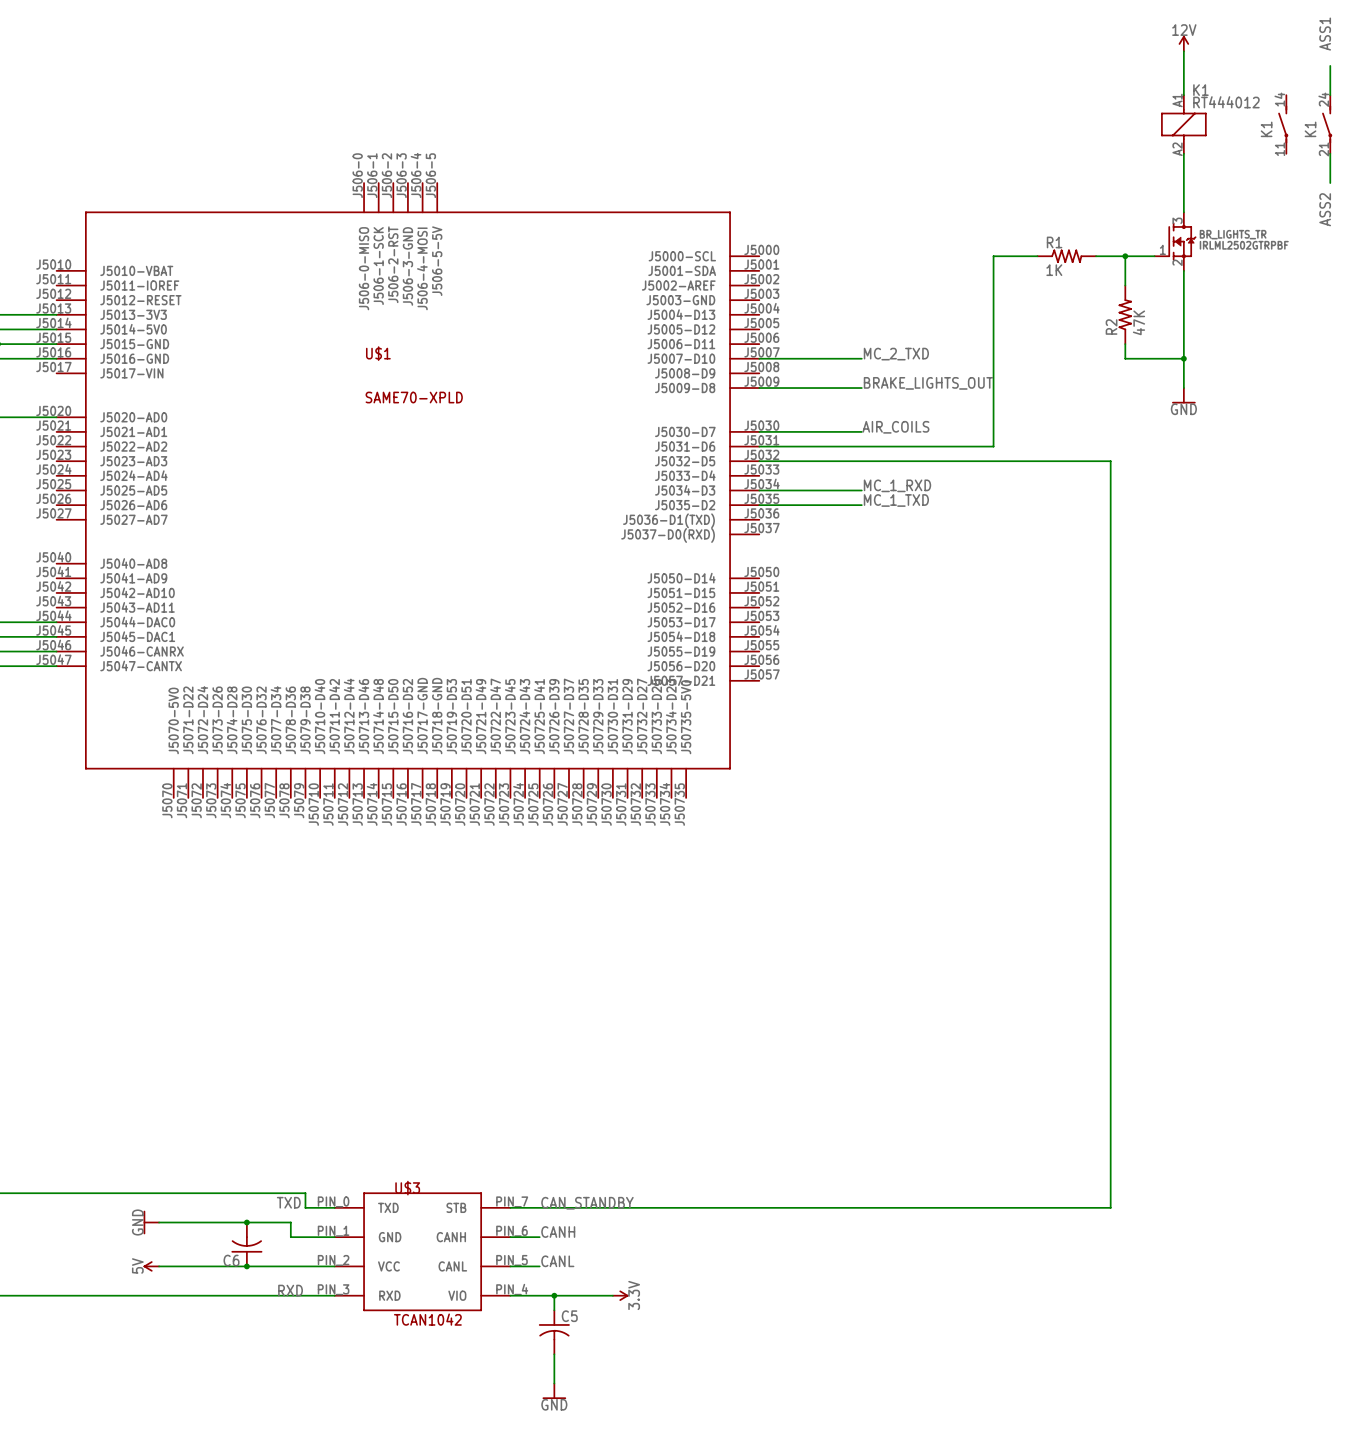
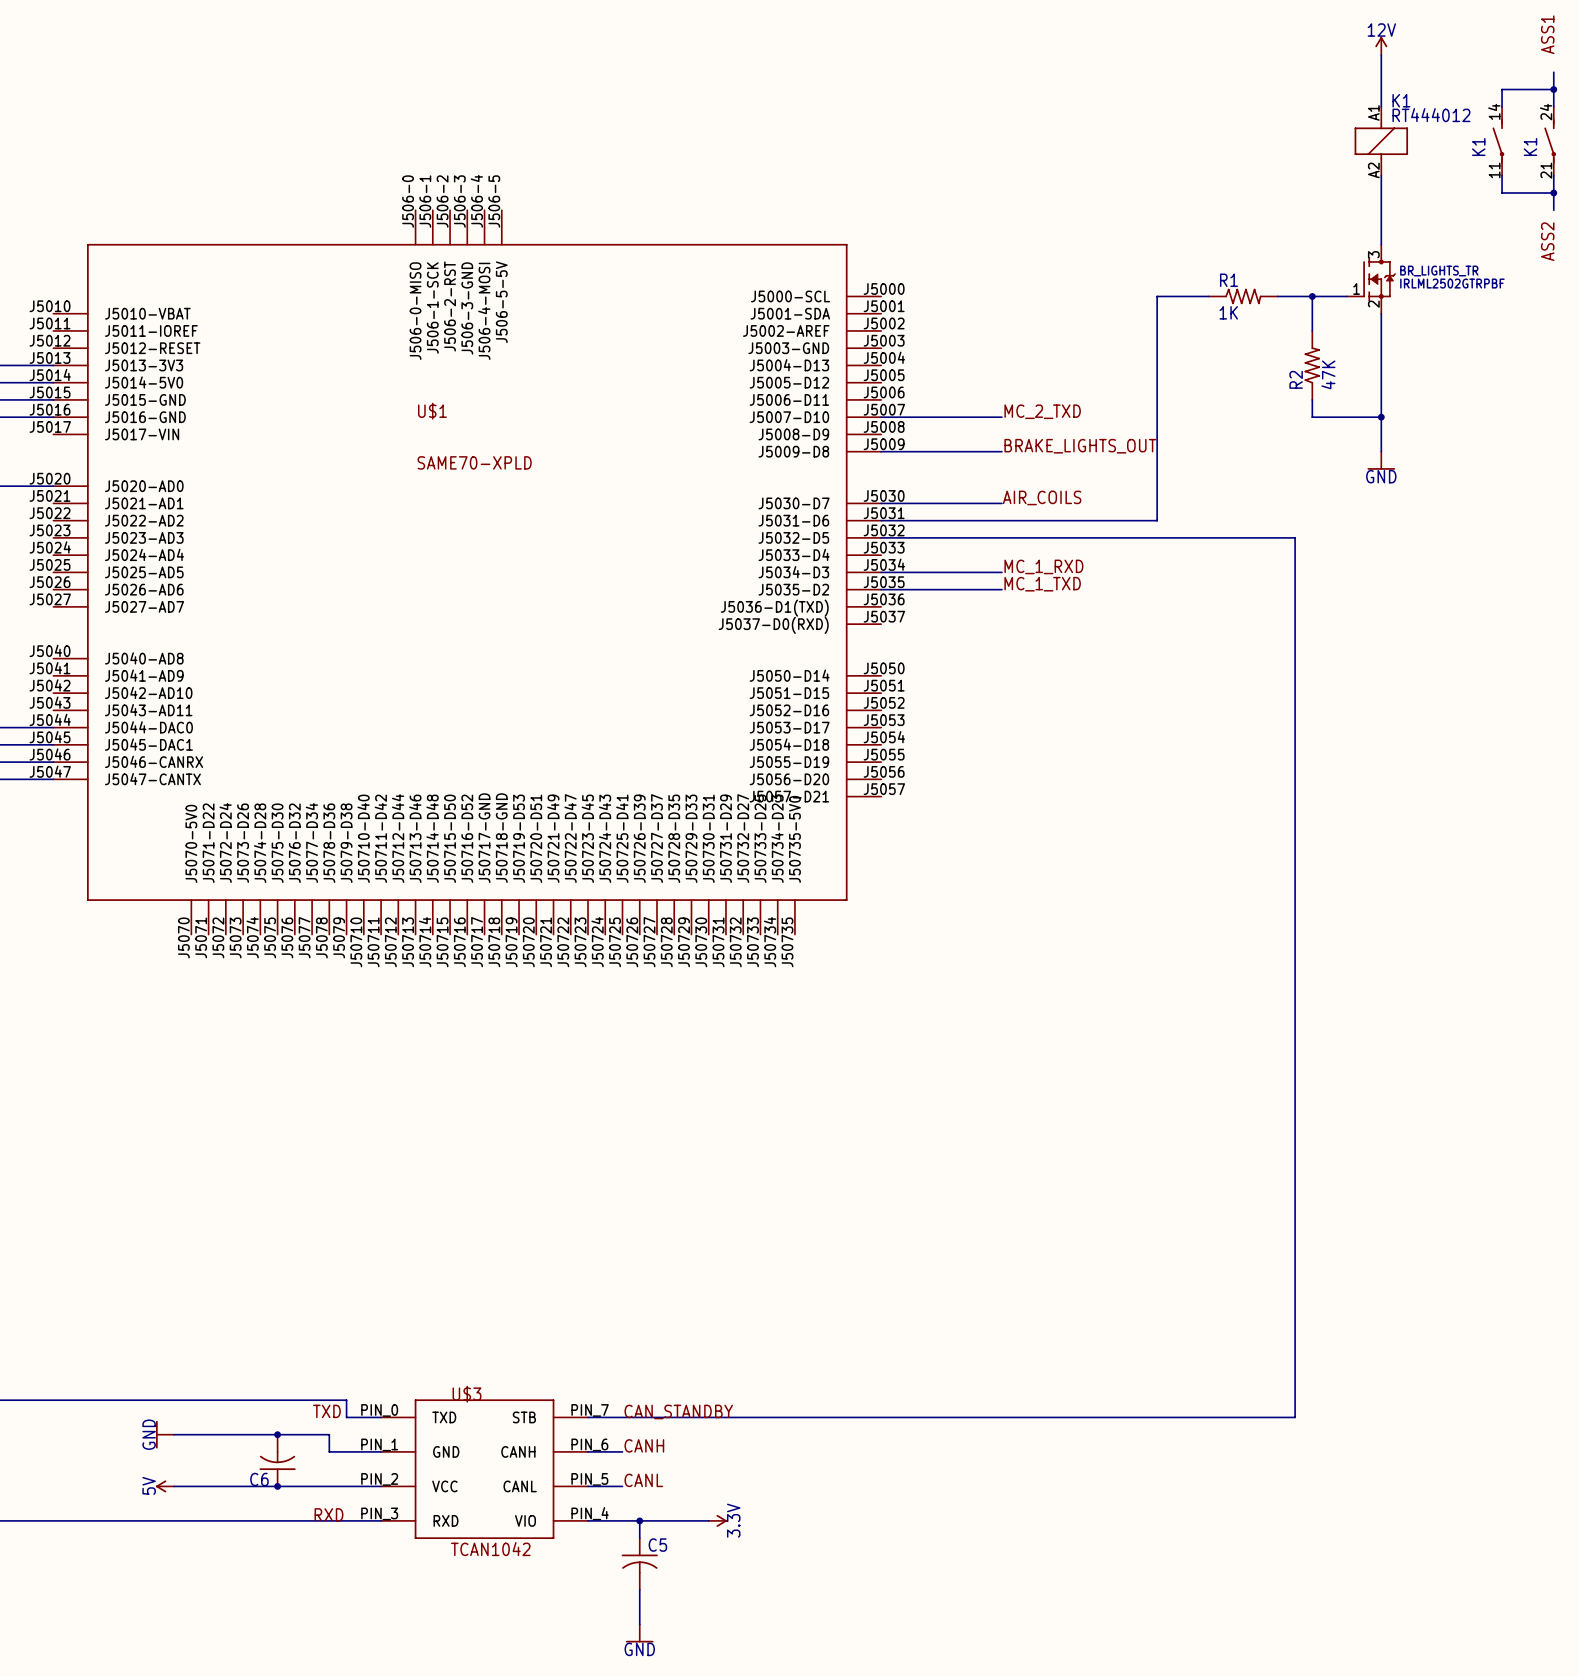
wire: none -> (1553, 89) (1502, 89) (1502, 106)
junction: none -> (1553, 89)
wire: none -> (1502, 175) (1502, 192) (1553, 192)
junction: none -> (1553, 192)

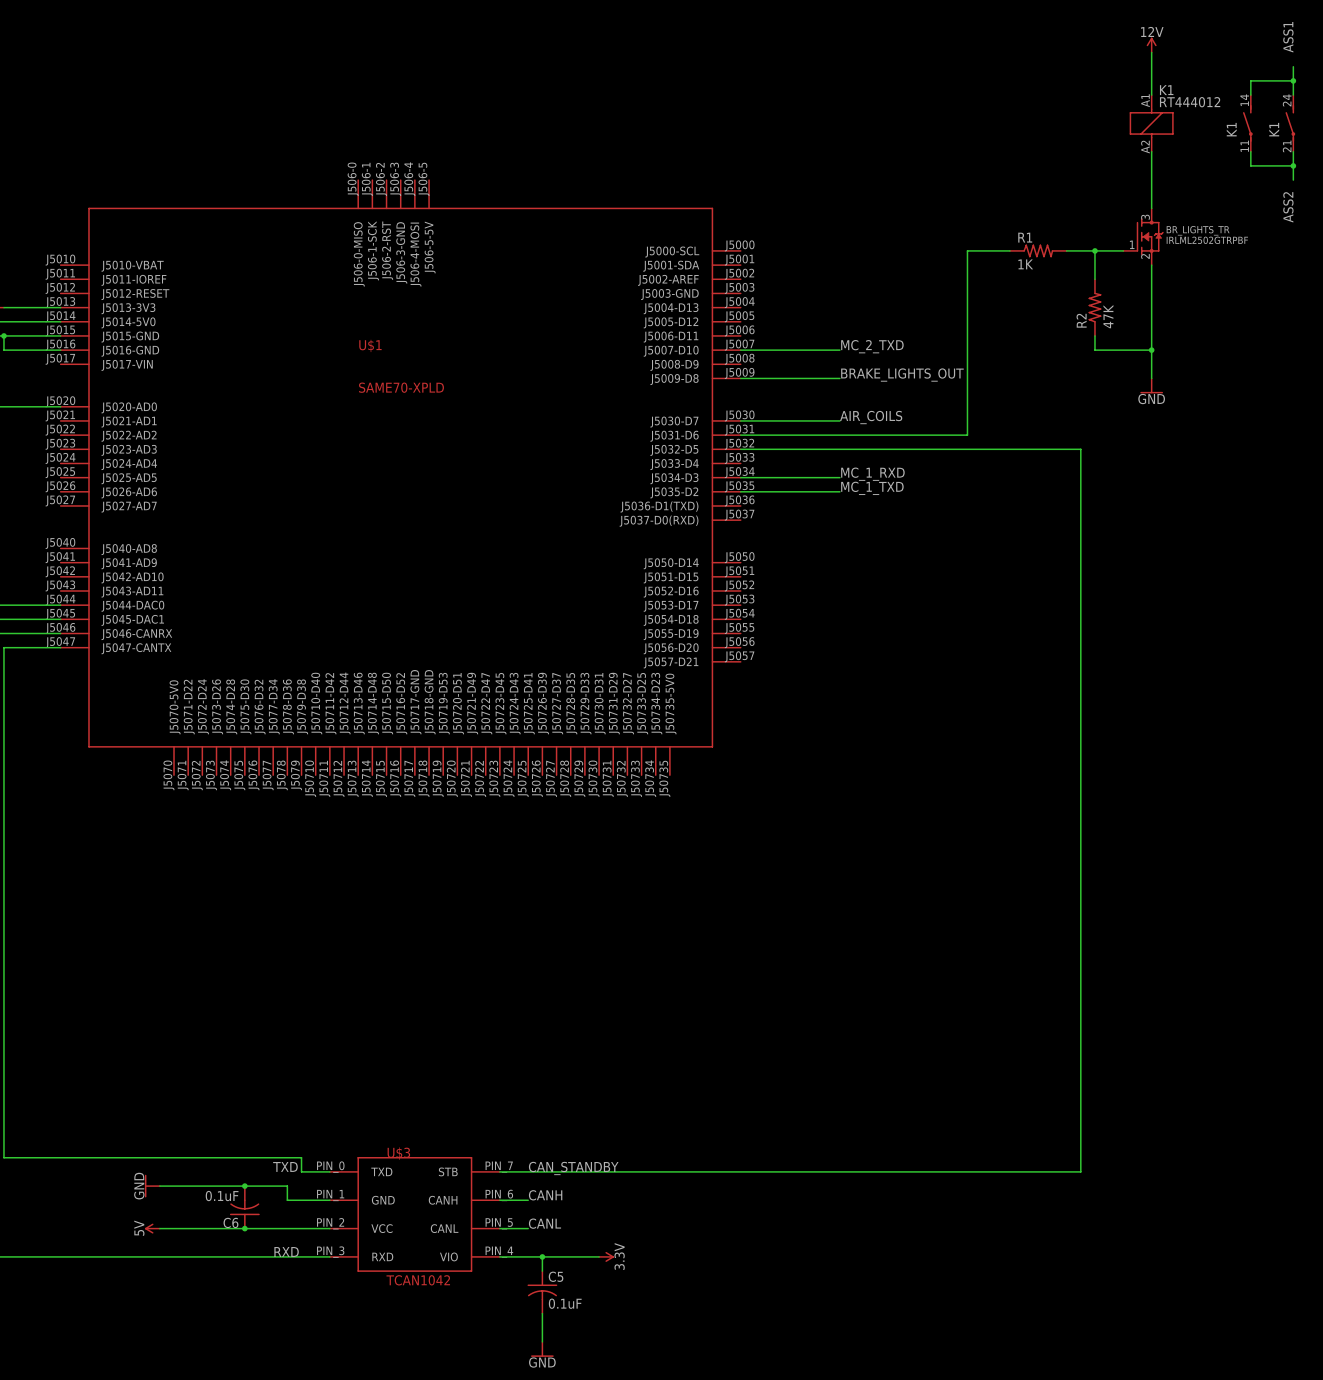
C6 value: none -> 0.1uF (222, 1196)
C5 value: none -> 0.1uF (565, 1303)

